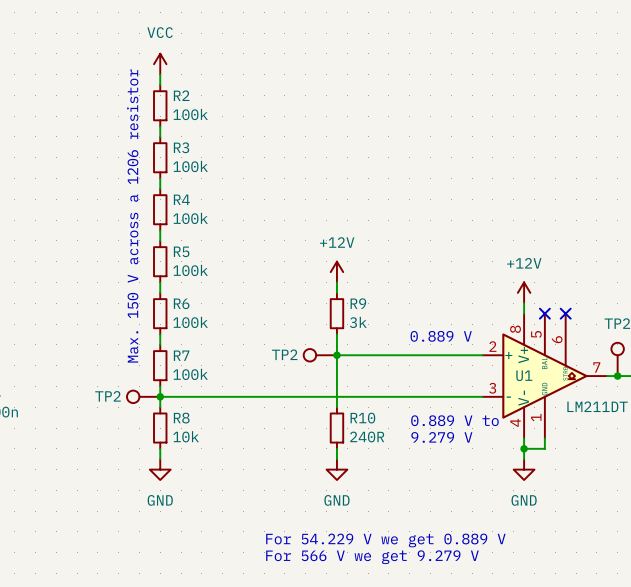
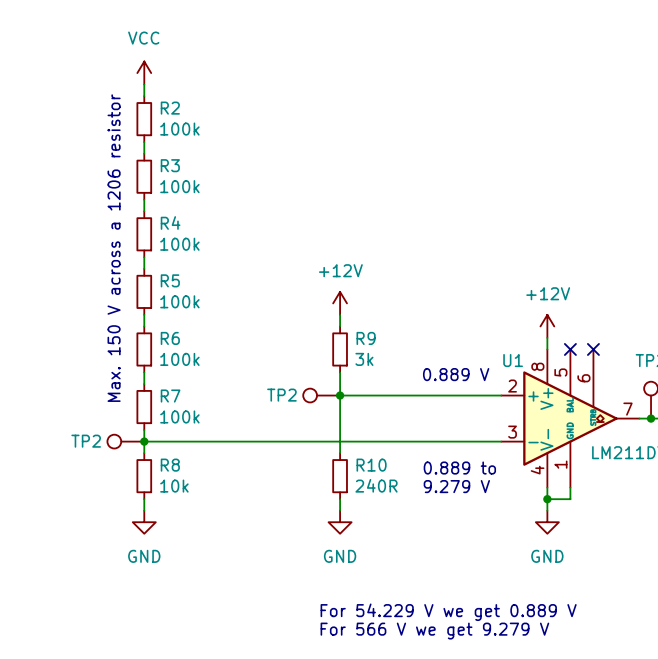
U1 name position: U1 (524, 375) -> U1 (513, 360)
text: 0.889 V to (454, 420) -> 0.889 to (459, 468)
text position: For 54.229 V we get 0.889 V (385, 540) -> For 54.229 V we get 0.889 V (448, 612)
text position: For 566 V we get 9.279 V (372, 557) -> For 566 V we get 9.279 V (434, 631)

